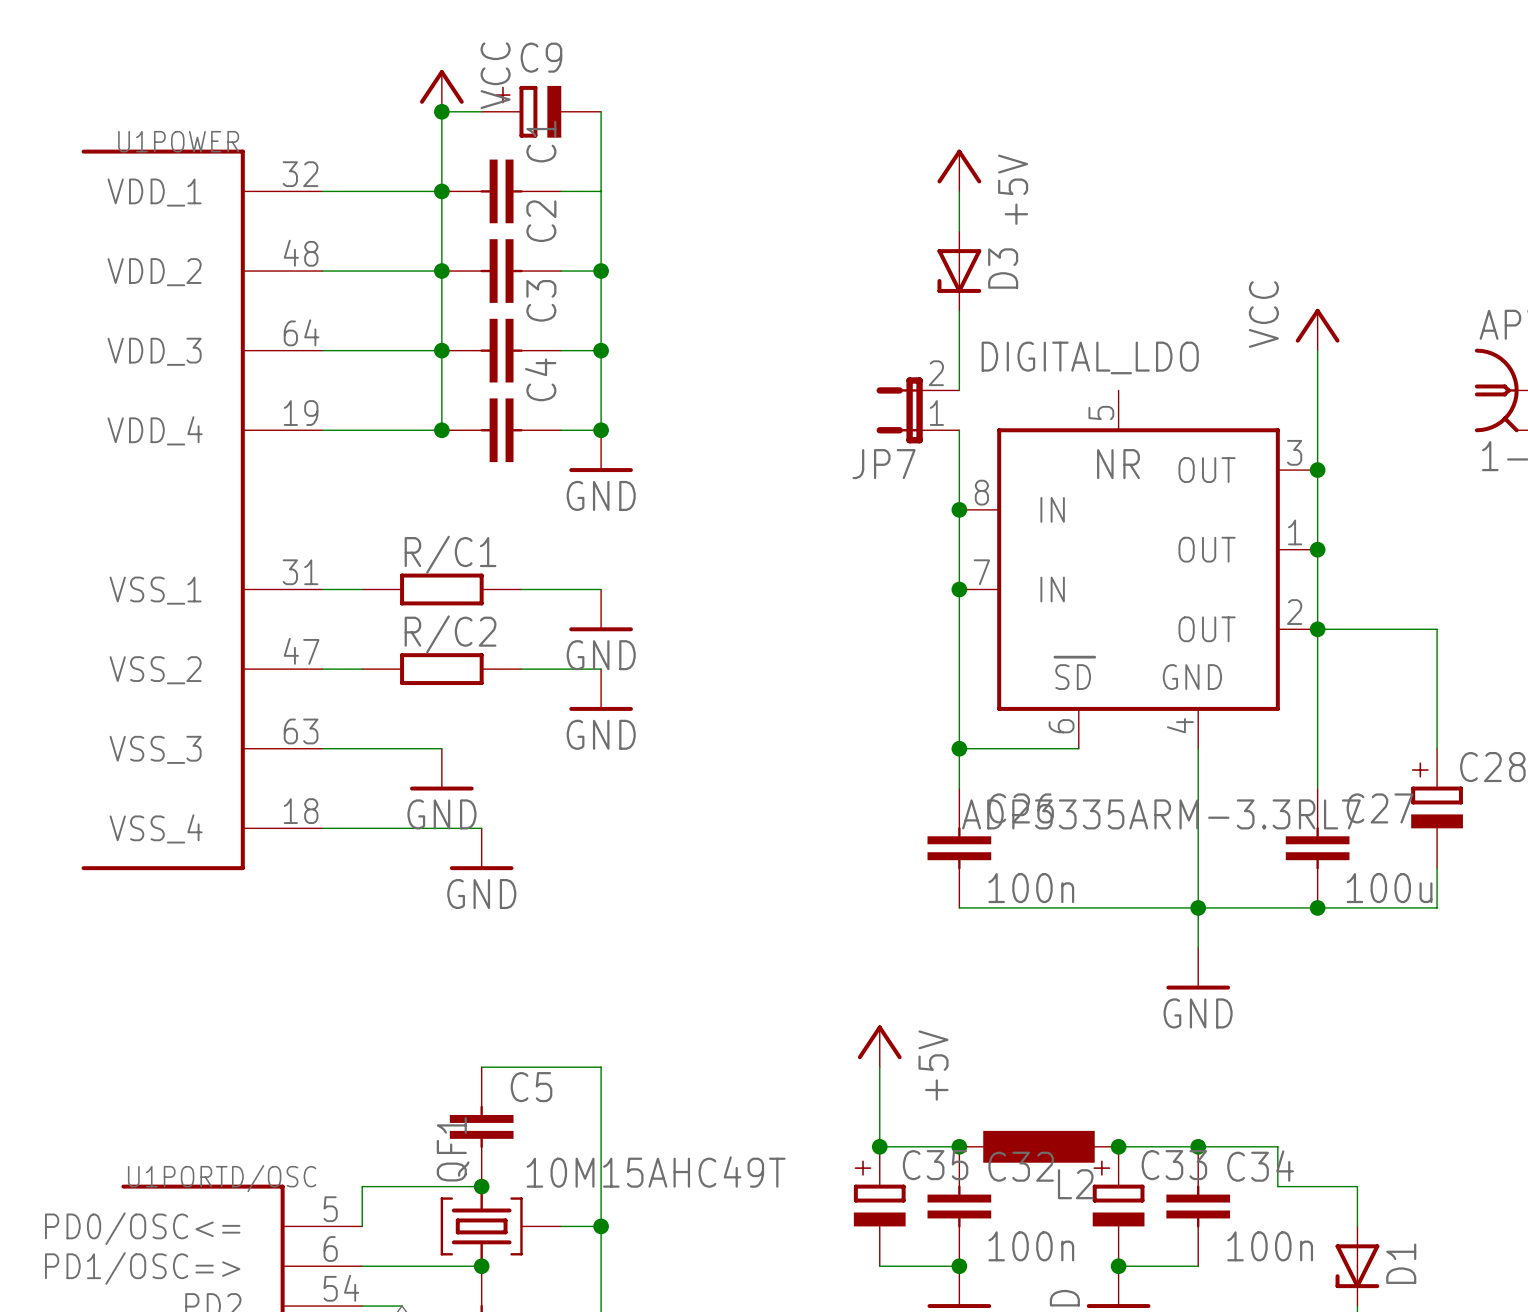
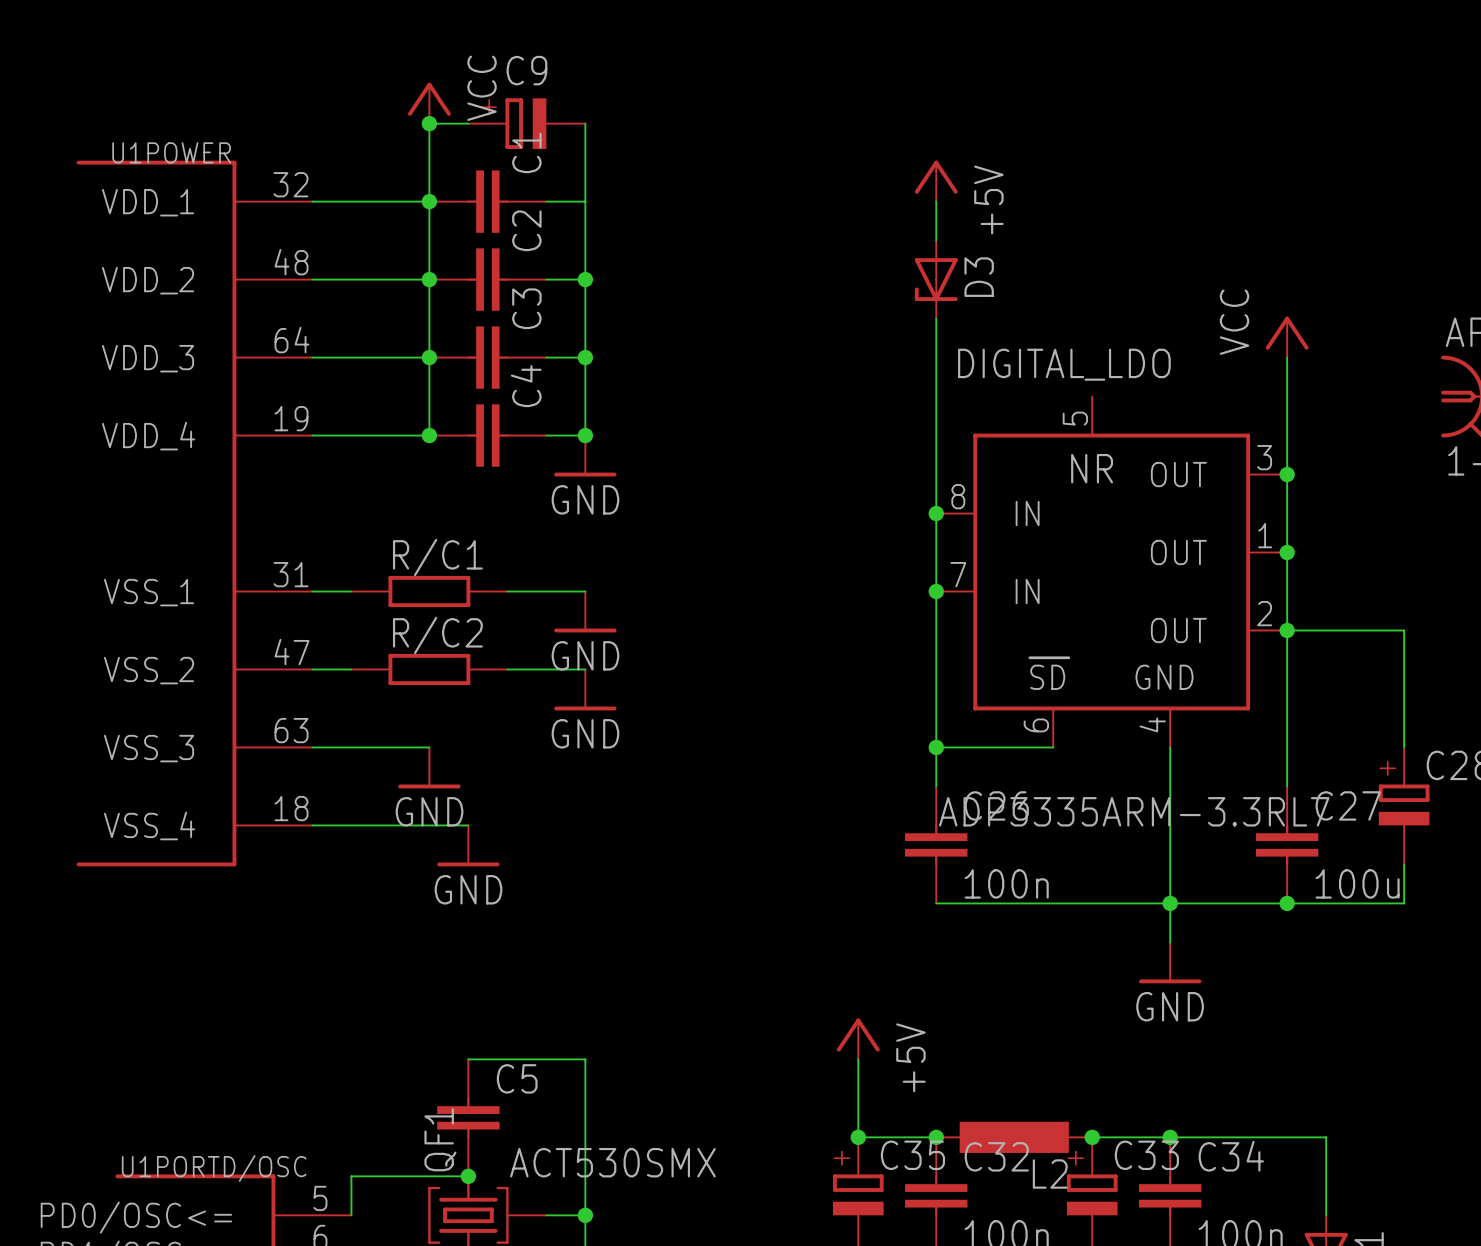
wire: none -> (936, 396) (936, 435)
JP7: (917, 410) -> none
wire: (1277, 1146) (1277, 1186) (1357, 1186) -> (1248, 1137) (1326, 1137) (1326, 1176)
QF1 value: 10M15AHC49T (656, 1172) -> ACT530SMX (612, 1162)

